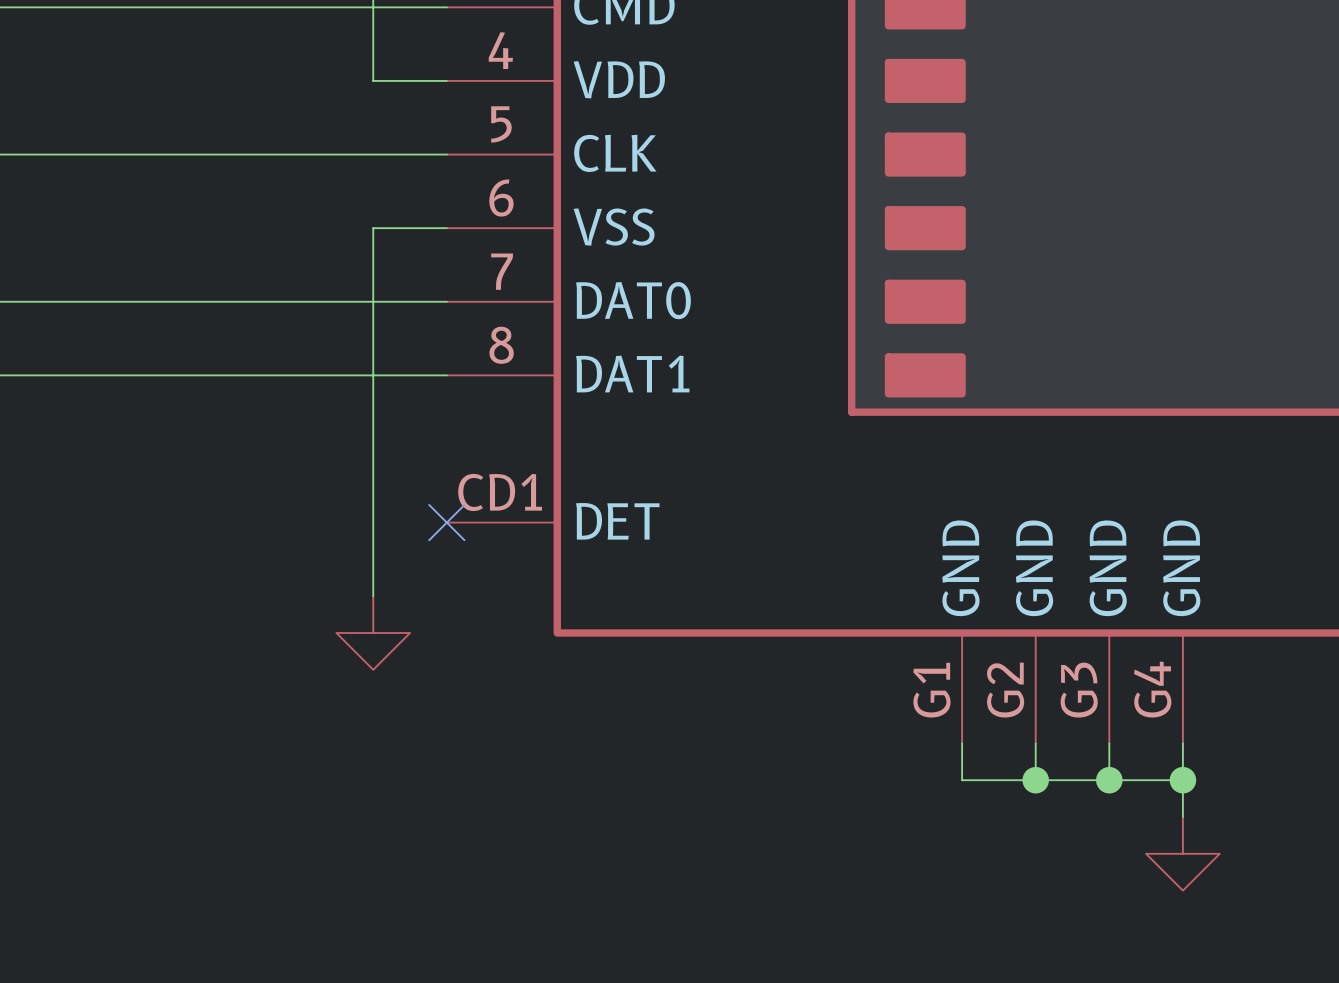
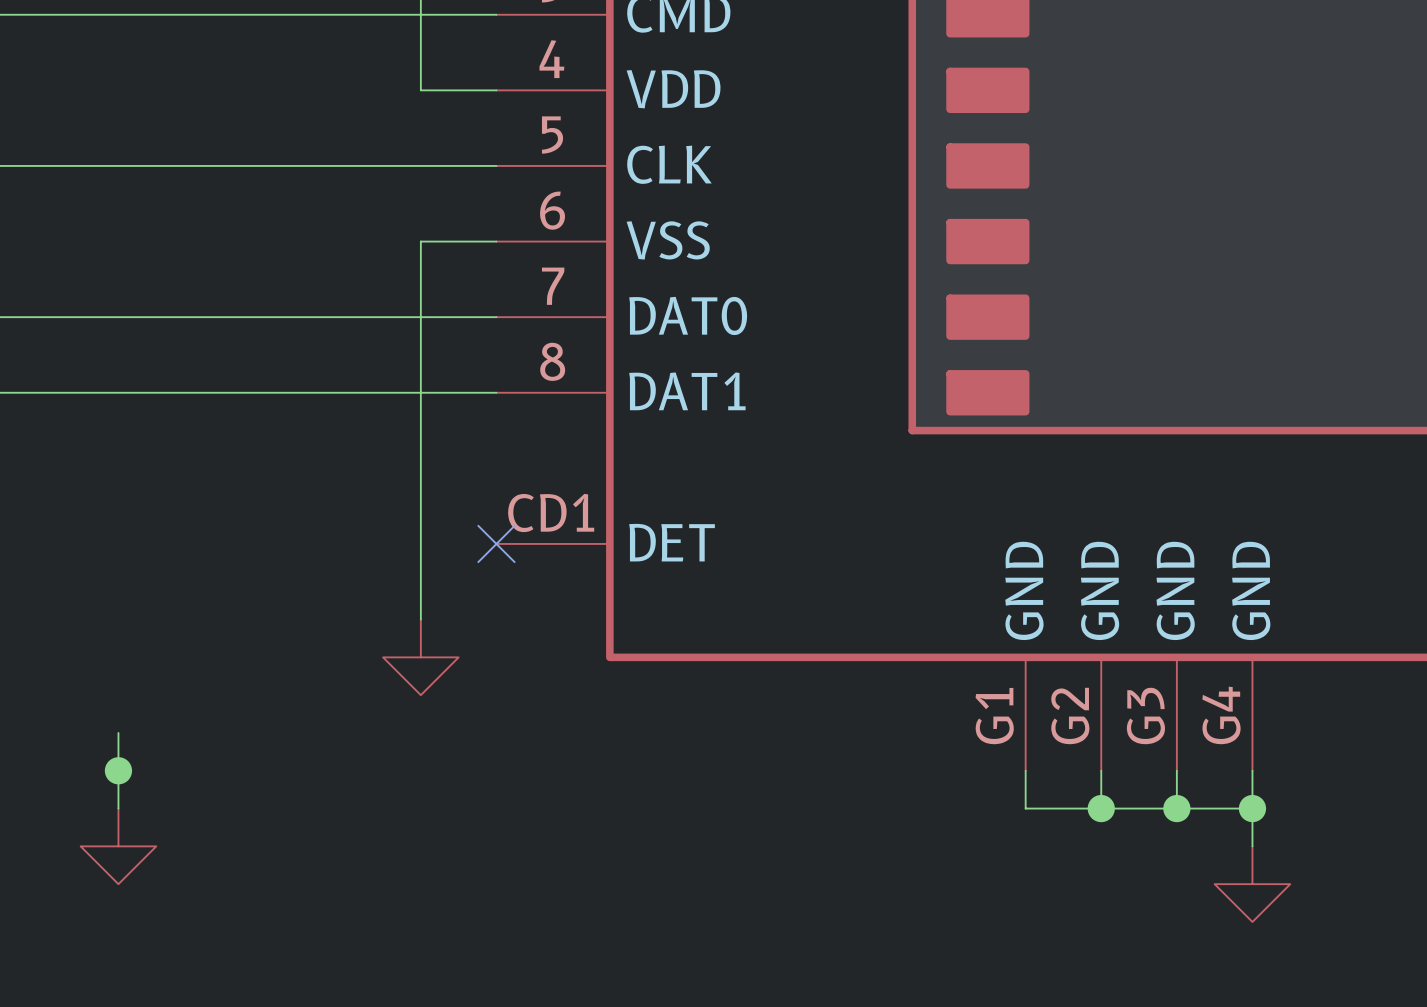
wire: none -> (118, 732) (118, 808)
junction: none -> (118, 770)
power symbol: none -> (118, 846)

